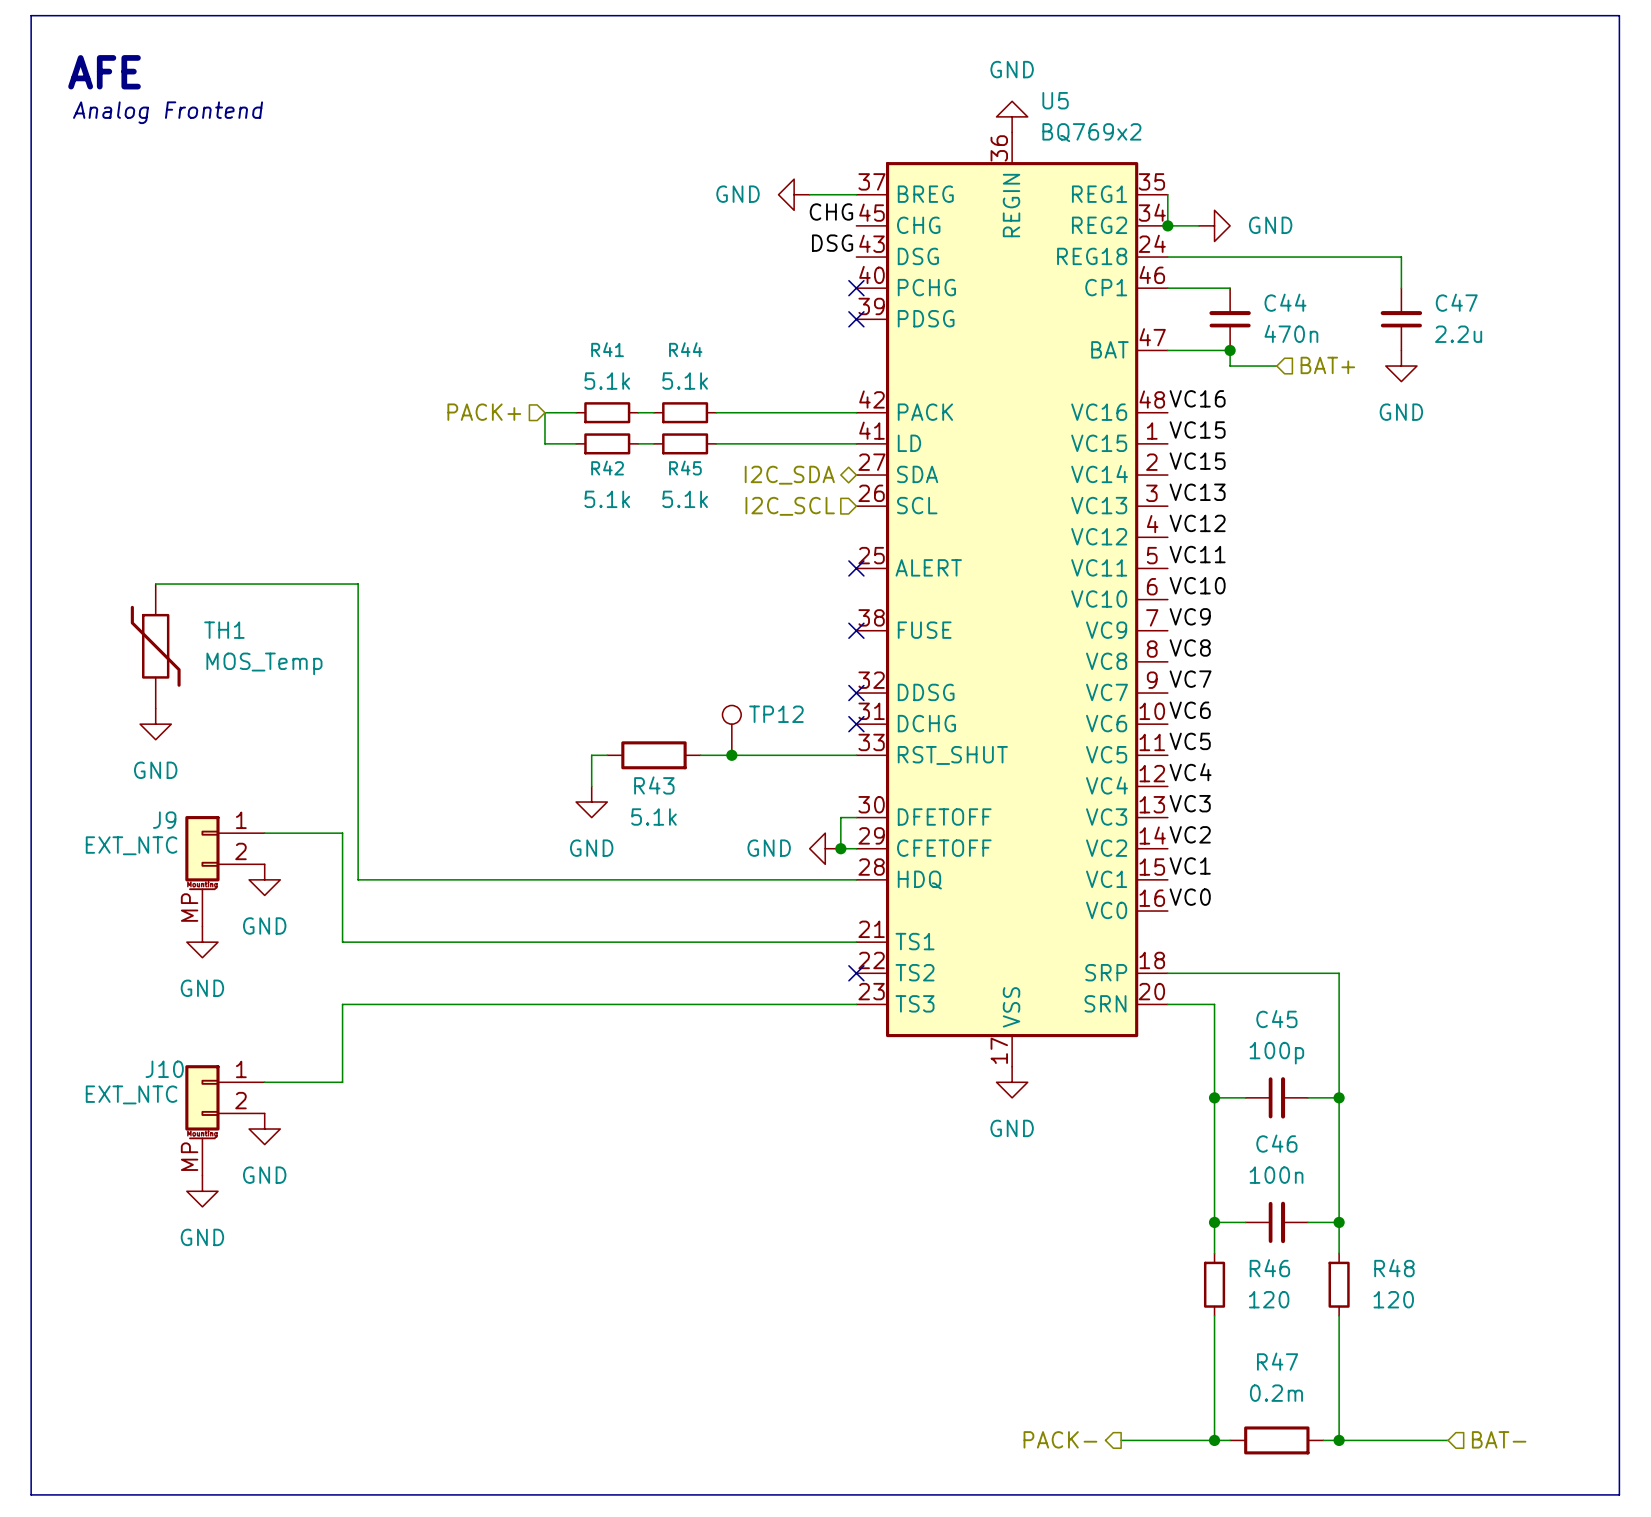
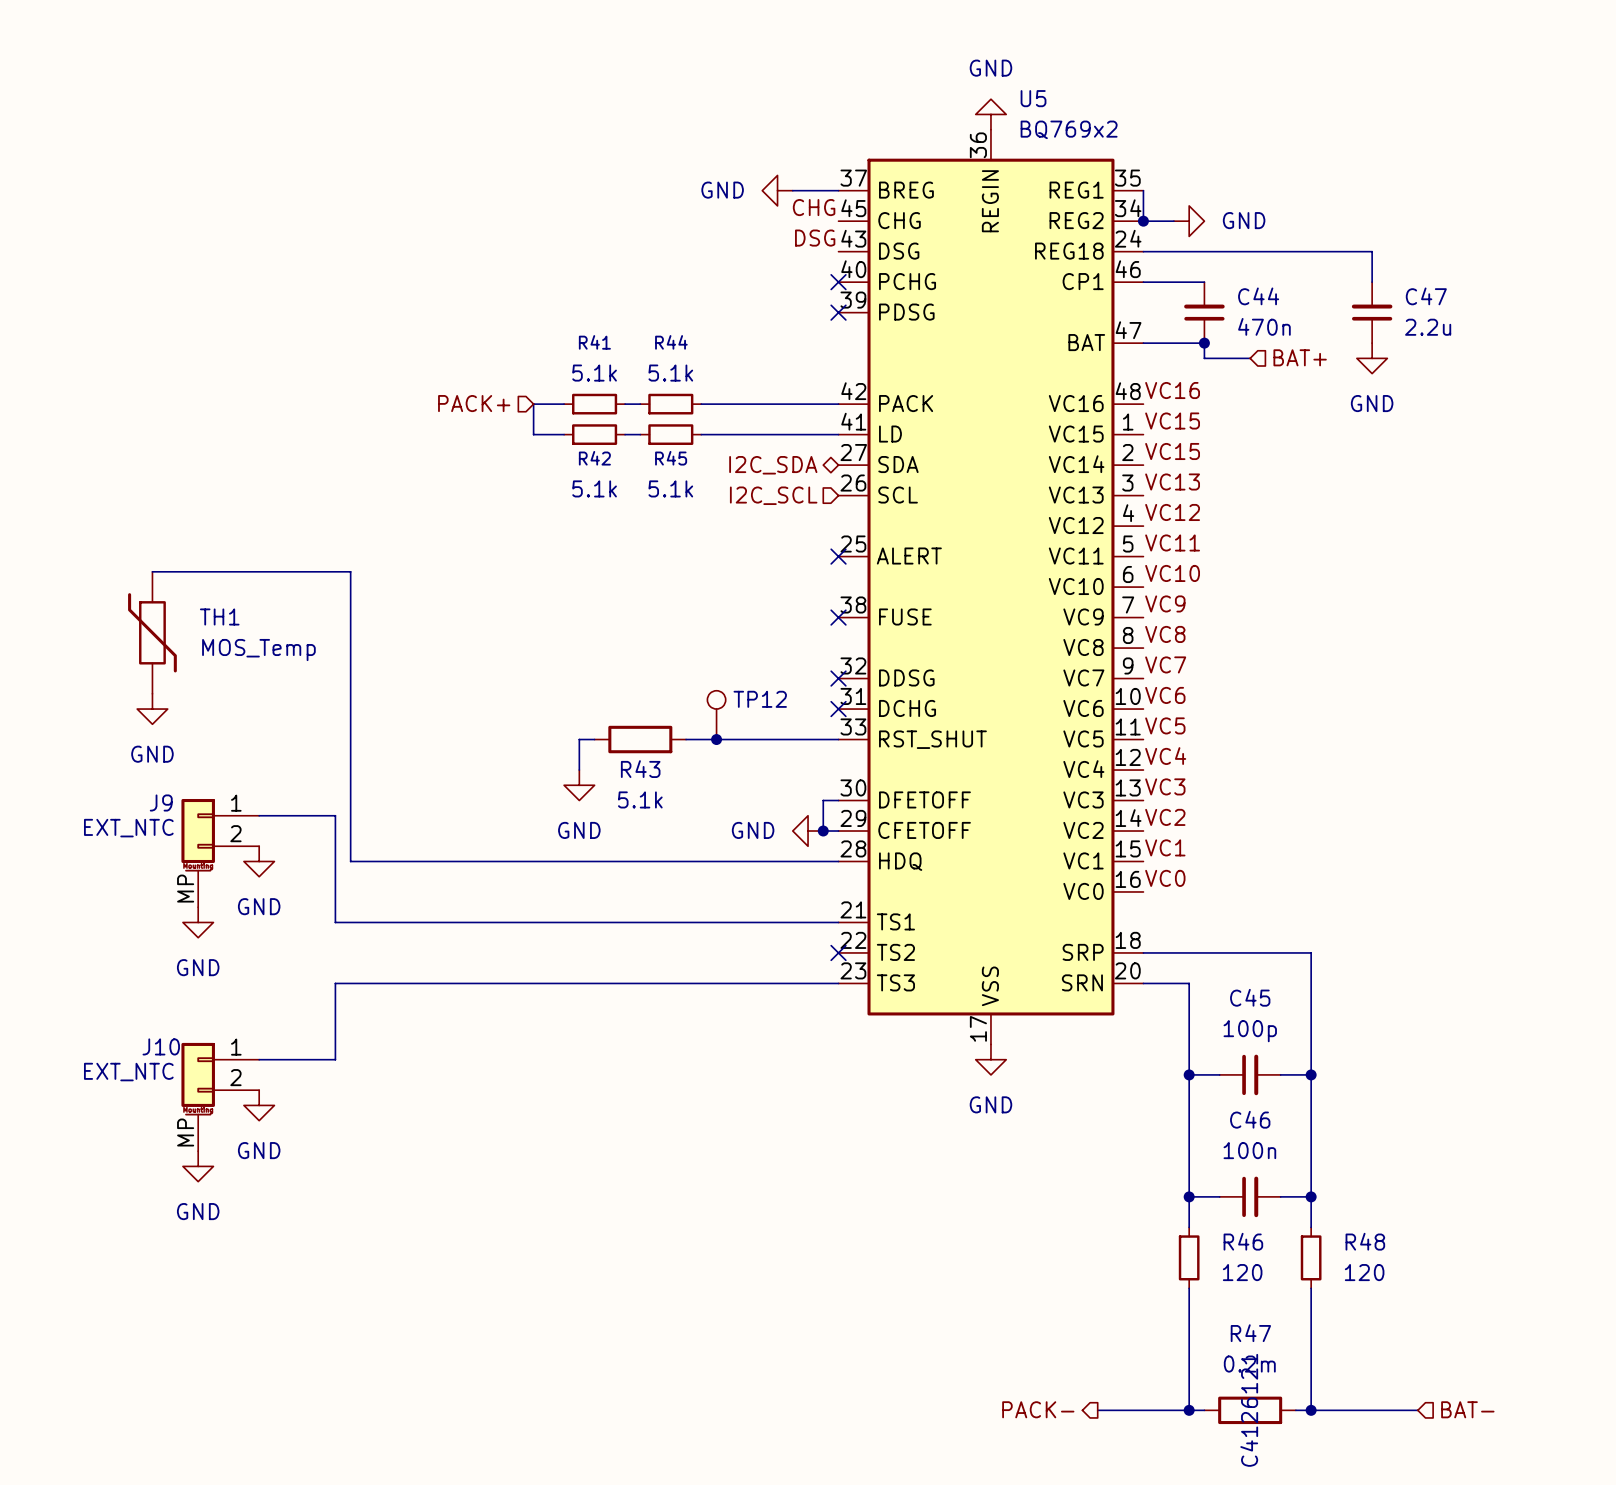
line: (31, 15) (1619, 15) (1619, 1494) (31, 1494) (31, 15) -> none
text: AFE (104, 72) -> none
text: Analog Frontend (168, 112) -> none
R47 text: none -> C4126121 (1249, 1410)

